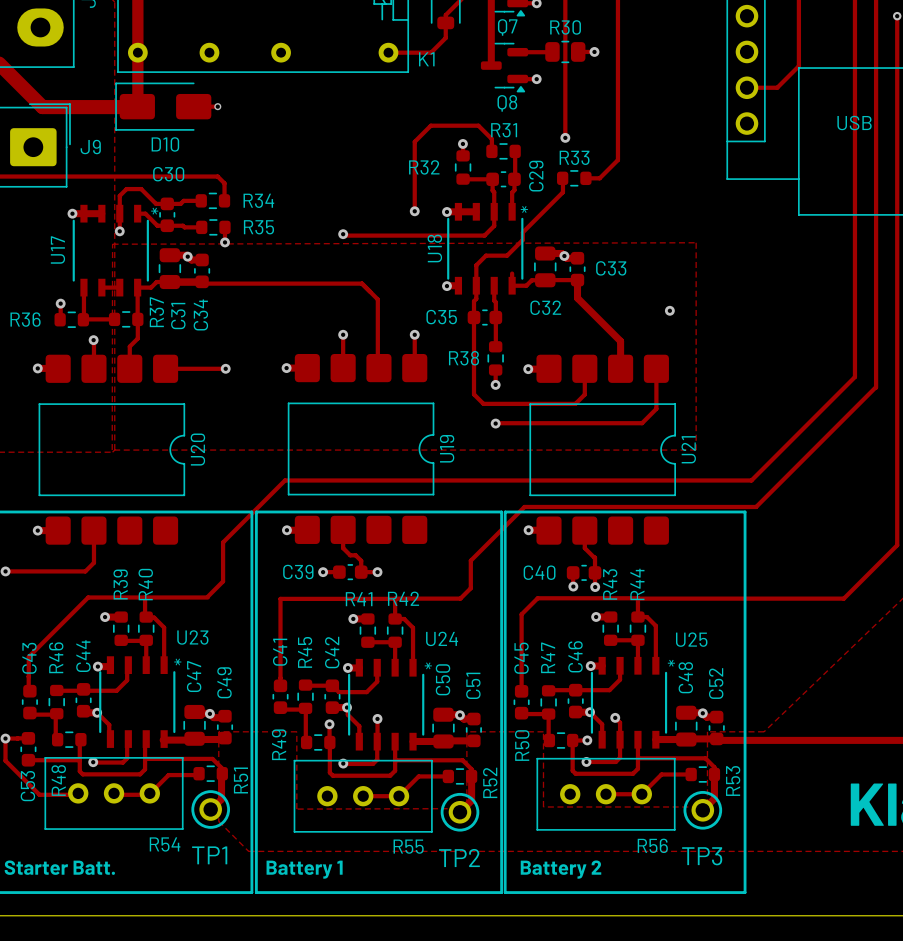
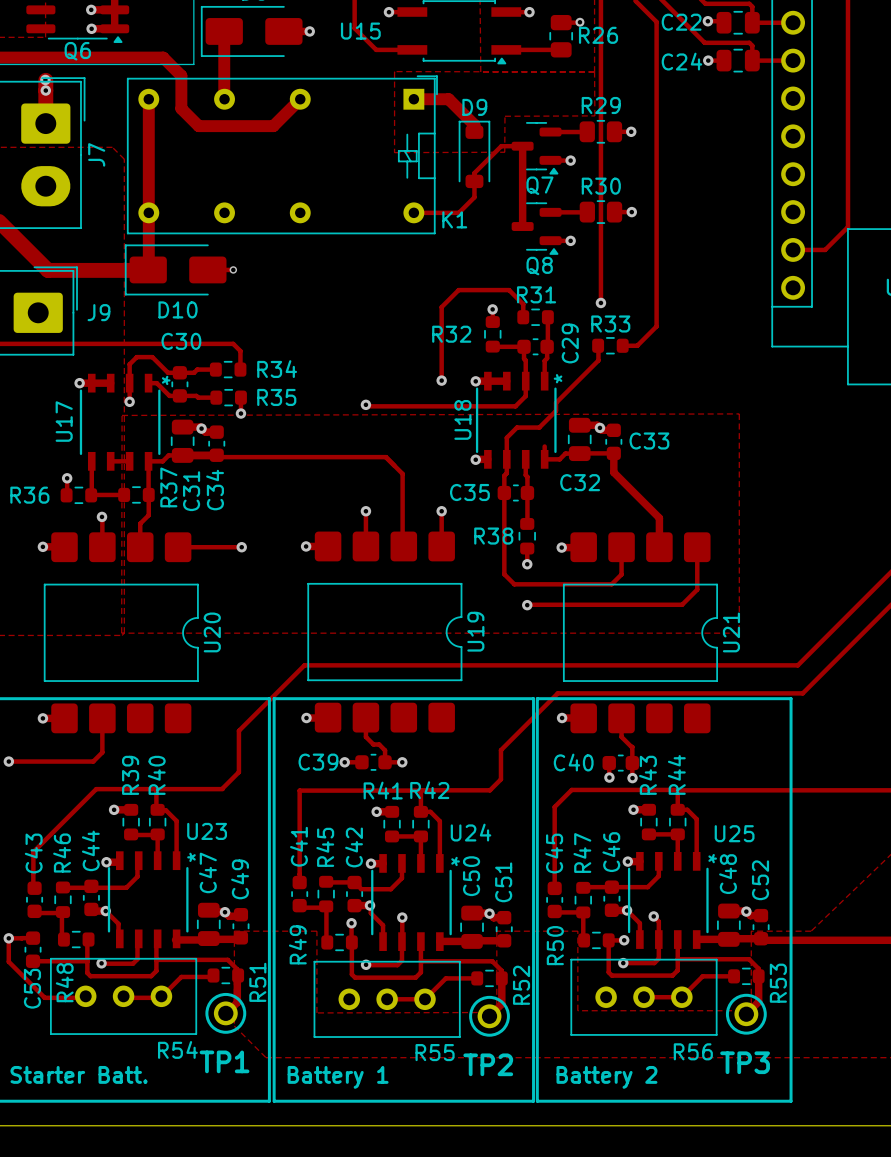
via: (669, 310) -> none

